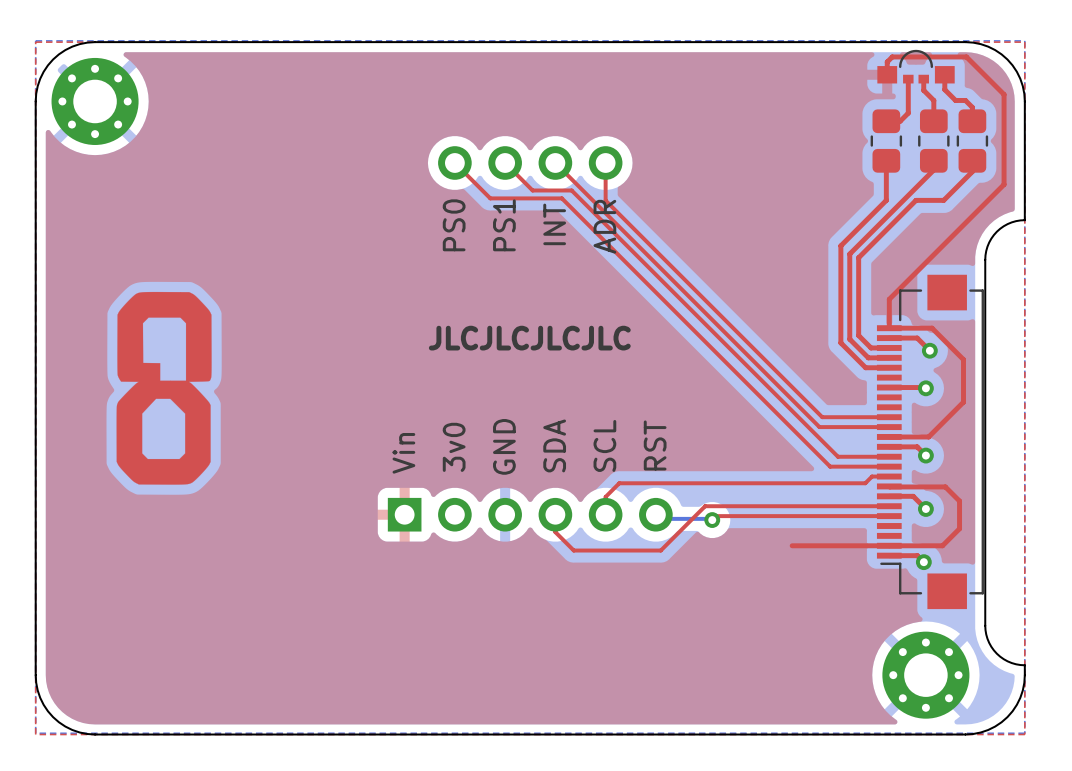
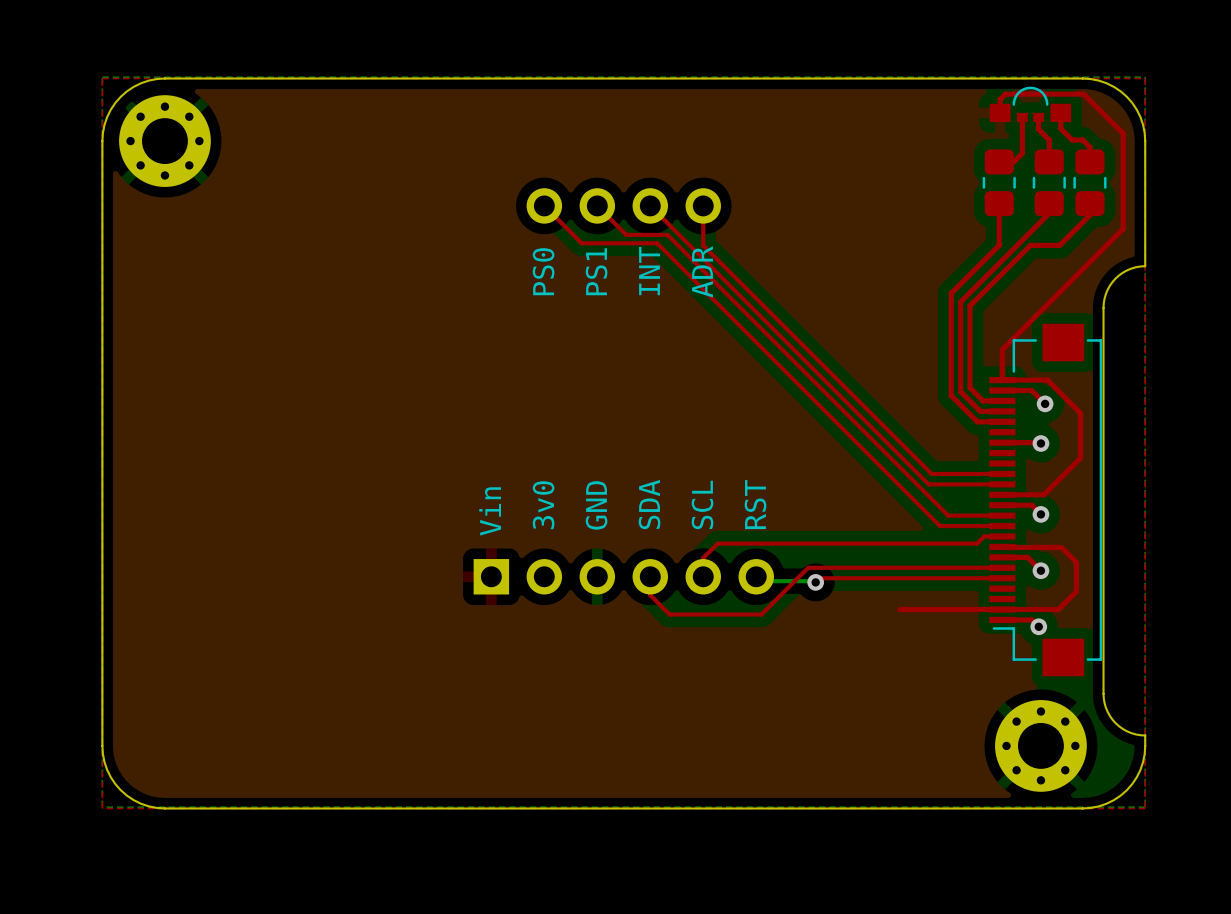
drawing: [116, 291, 212, 485] -> none
text: JLCJLCJLCJLC (529, 338) -> none

